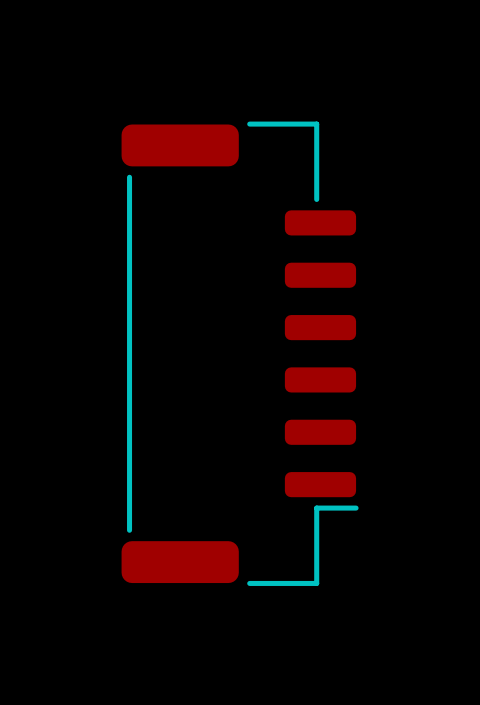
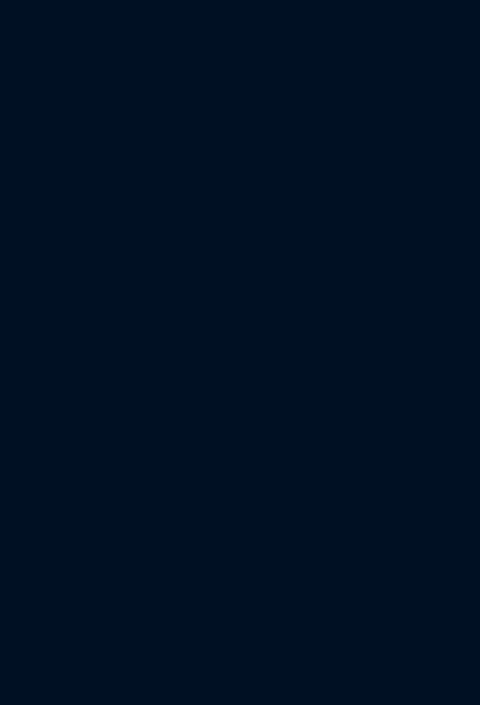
part: (240, 353) -> none

